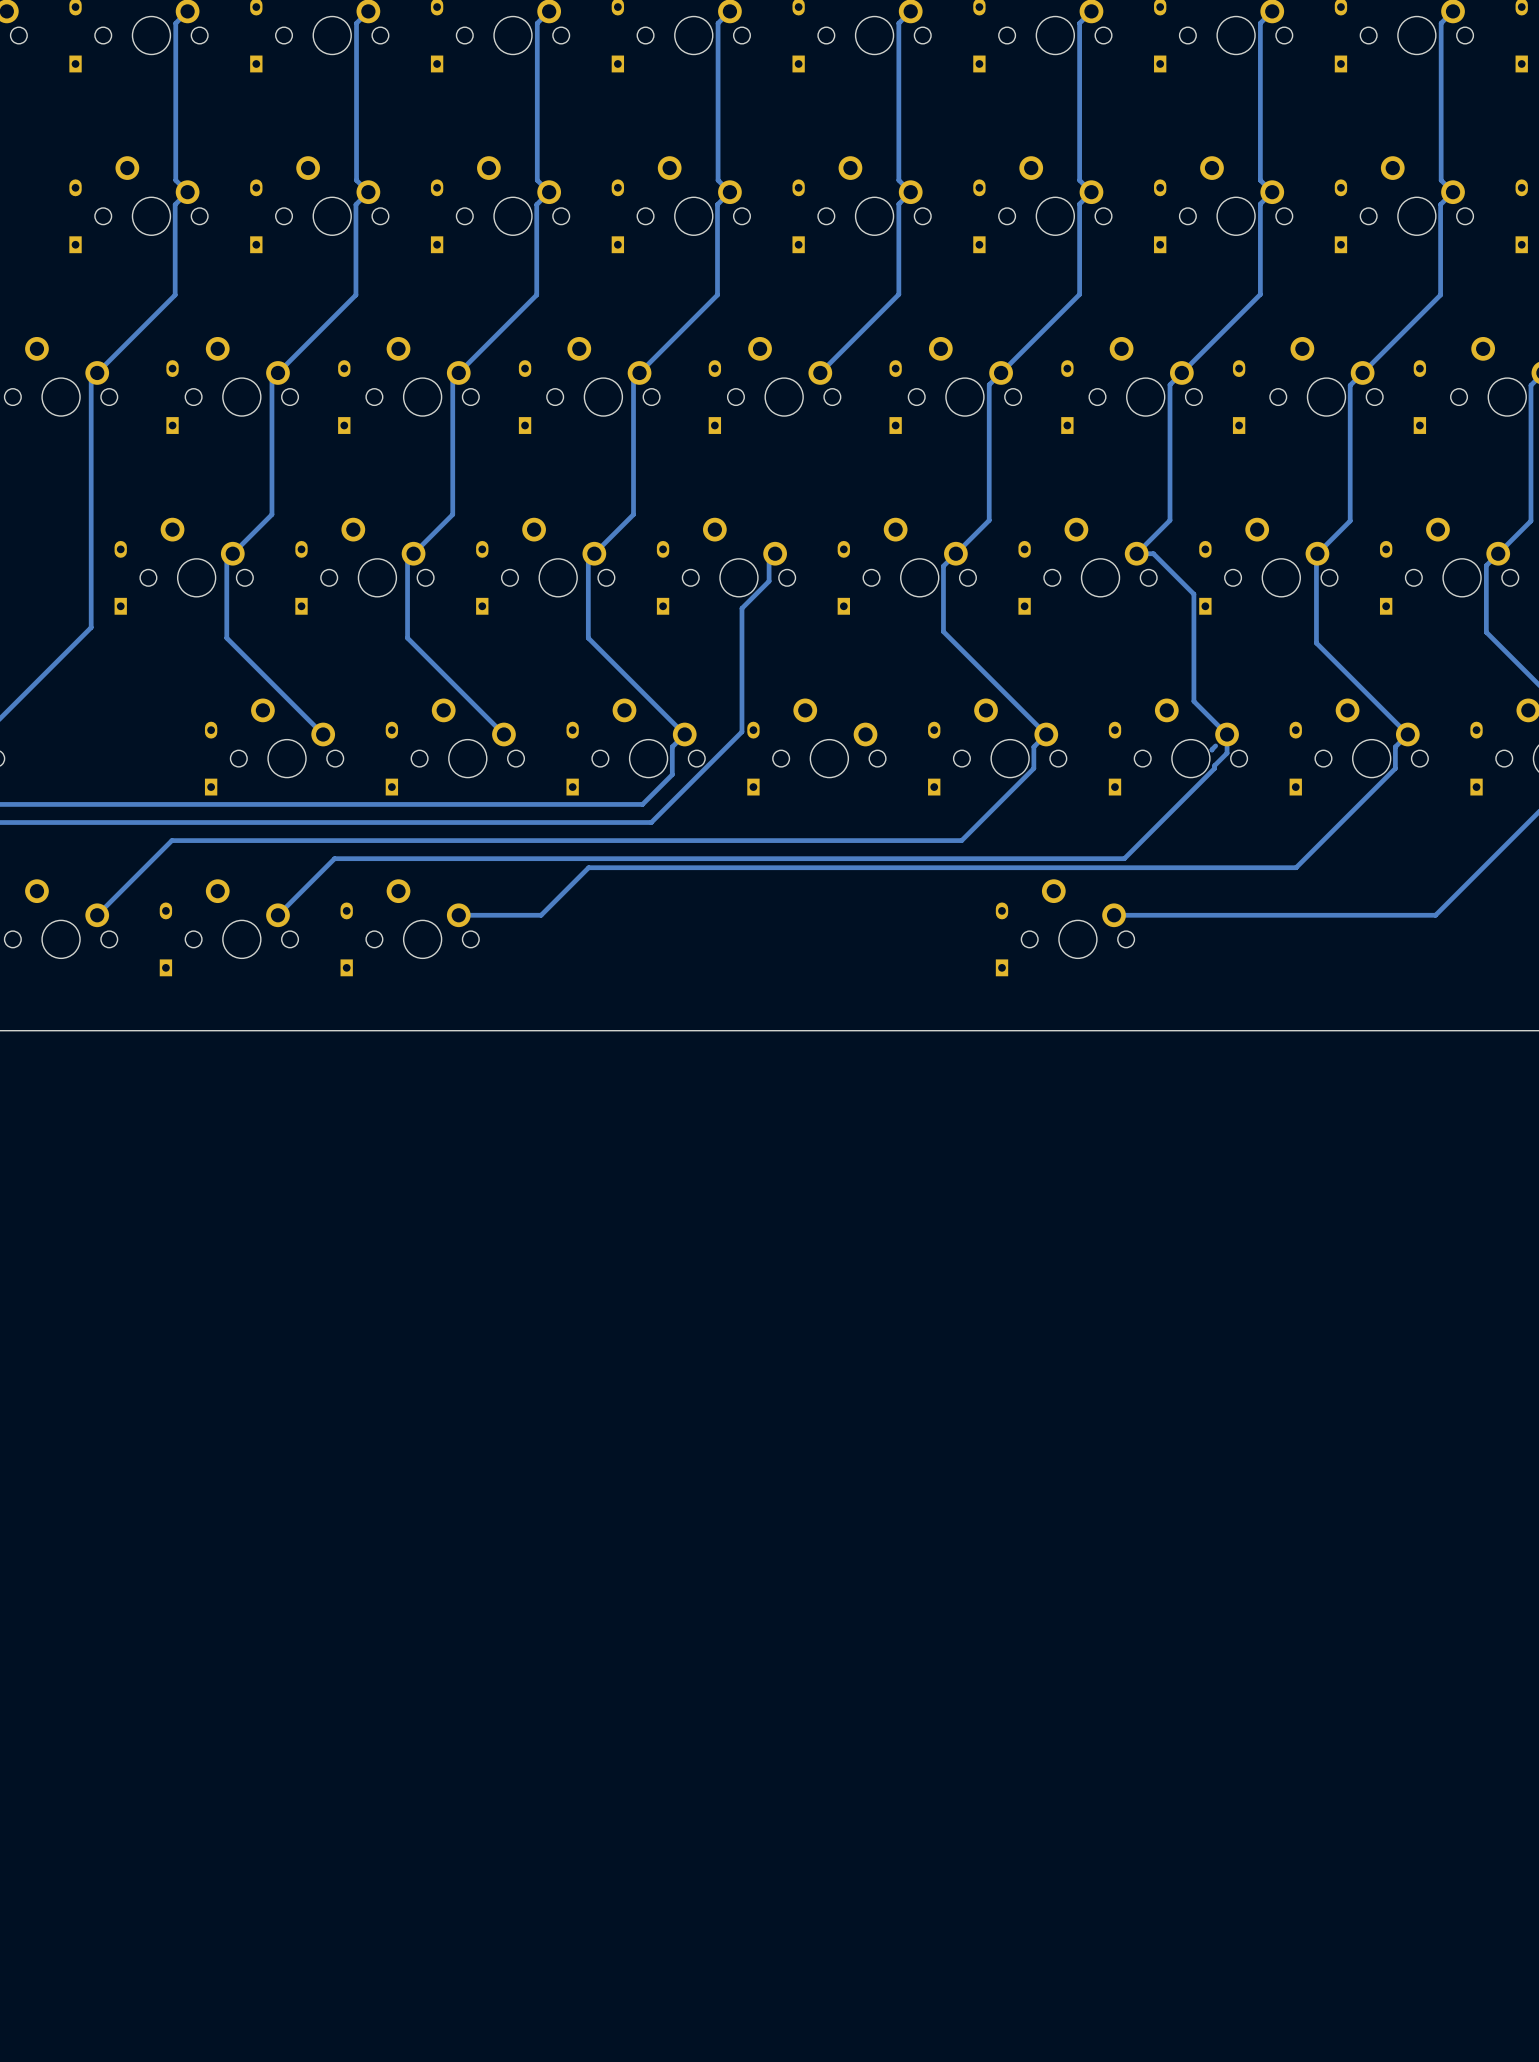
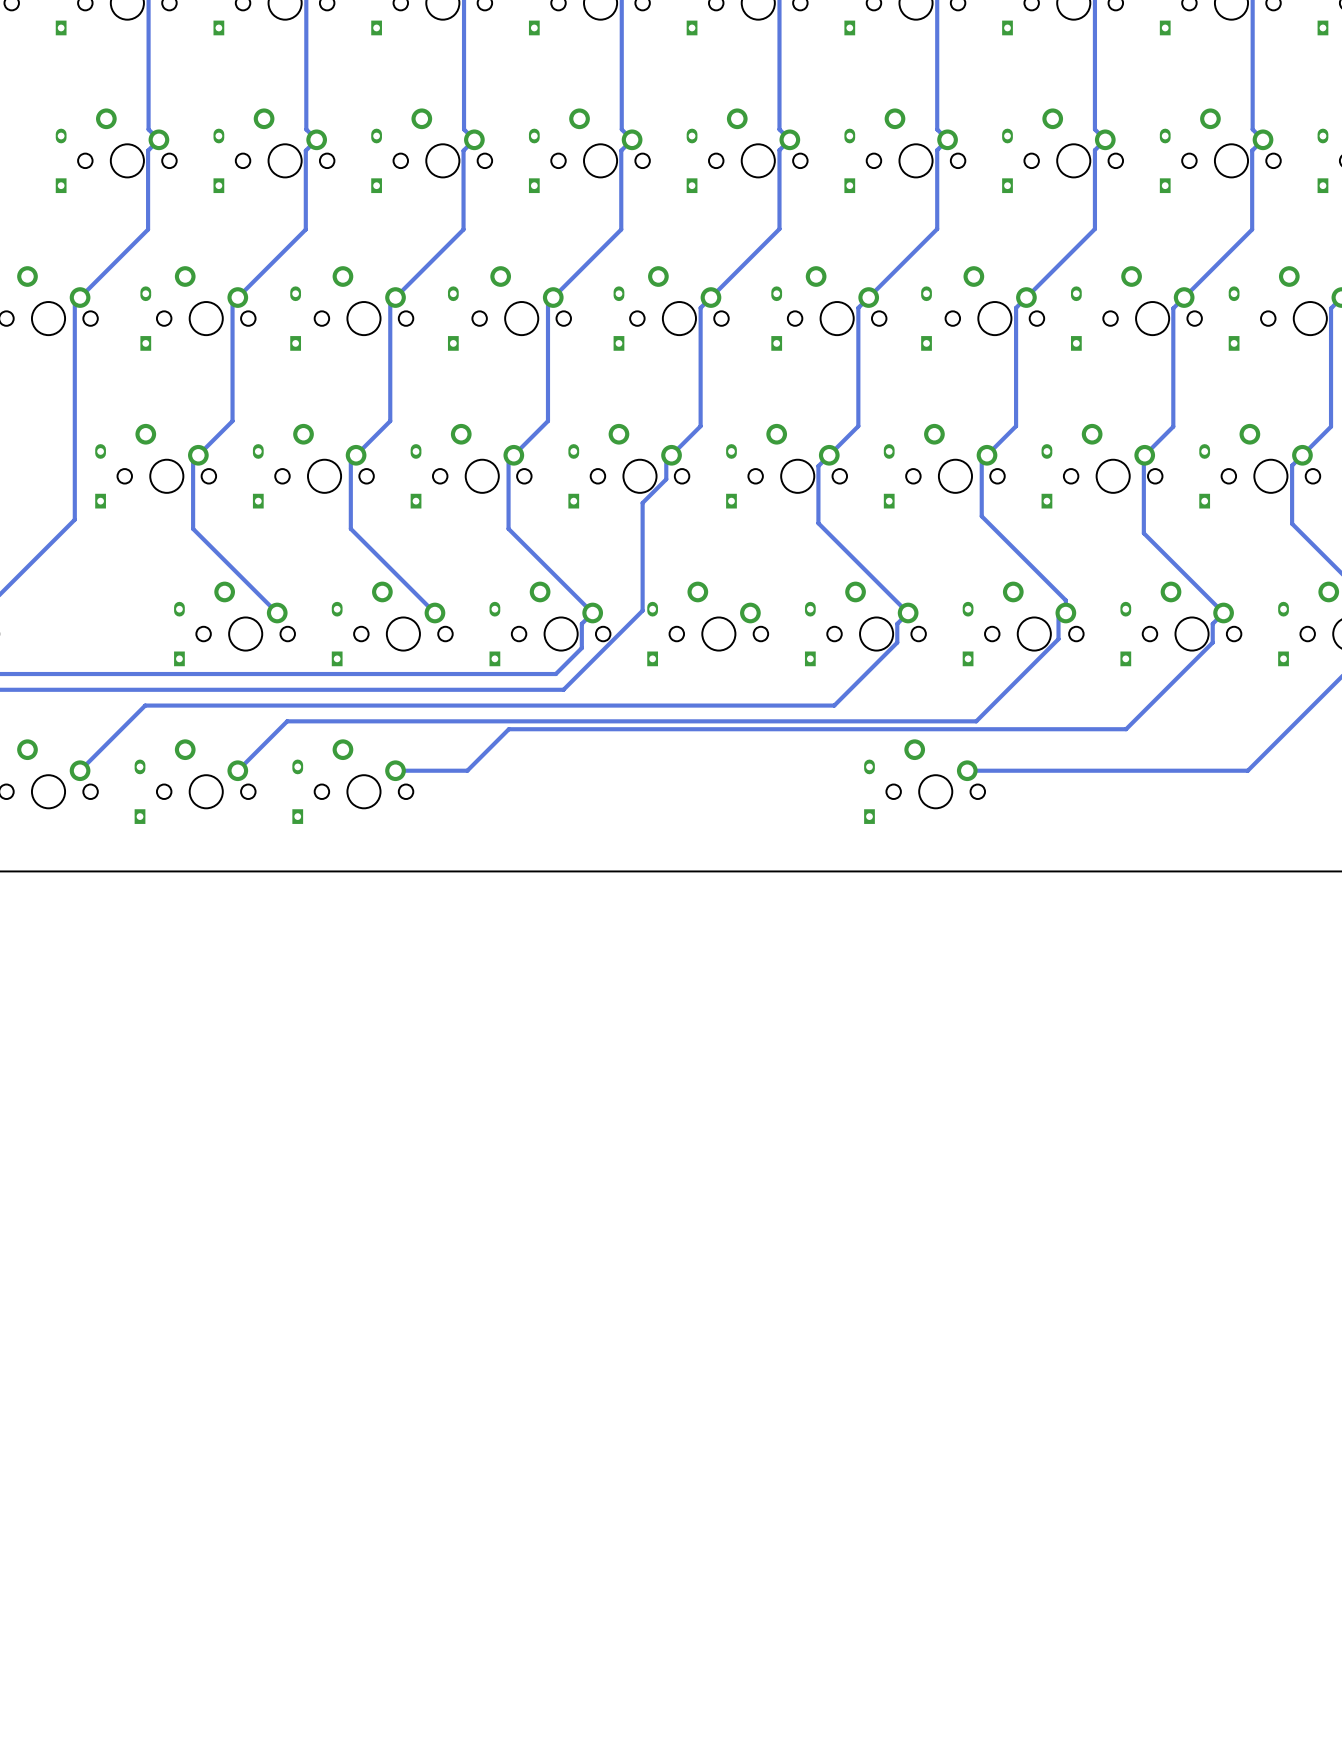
track: none -> (710, 297) (700, 307) (700, 426) (671, 455)
track: (1136, 553) (1153, 553) (1193, 594) (1193, 701) (1227, 734) (1227, 753) (1214, 765) (1214, 768) -> (986, 455) (981, 460) (981, 516) (1065, 600) (1065, 612) (1058, 612) (1058, 639) (1055, 642)
track: (1215, 745) (1211, 750) -> none

